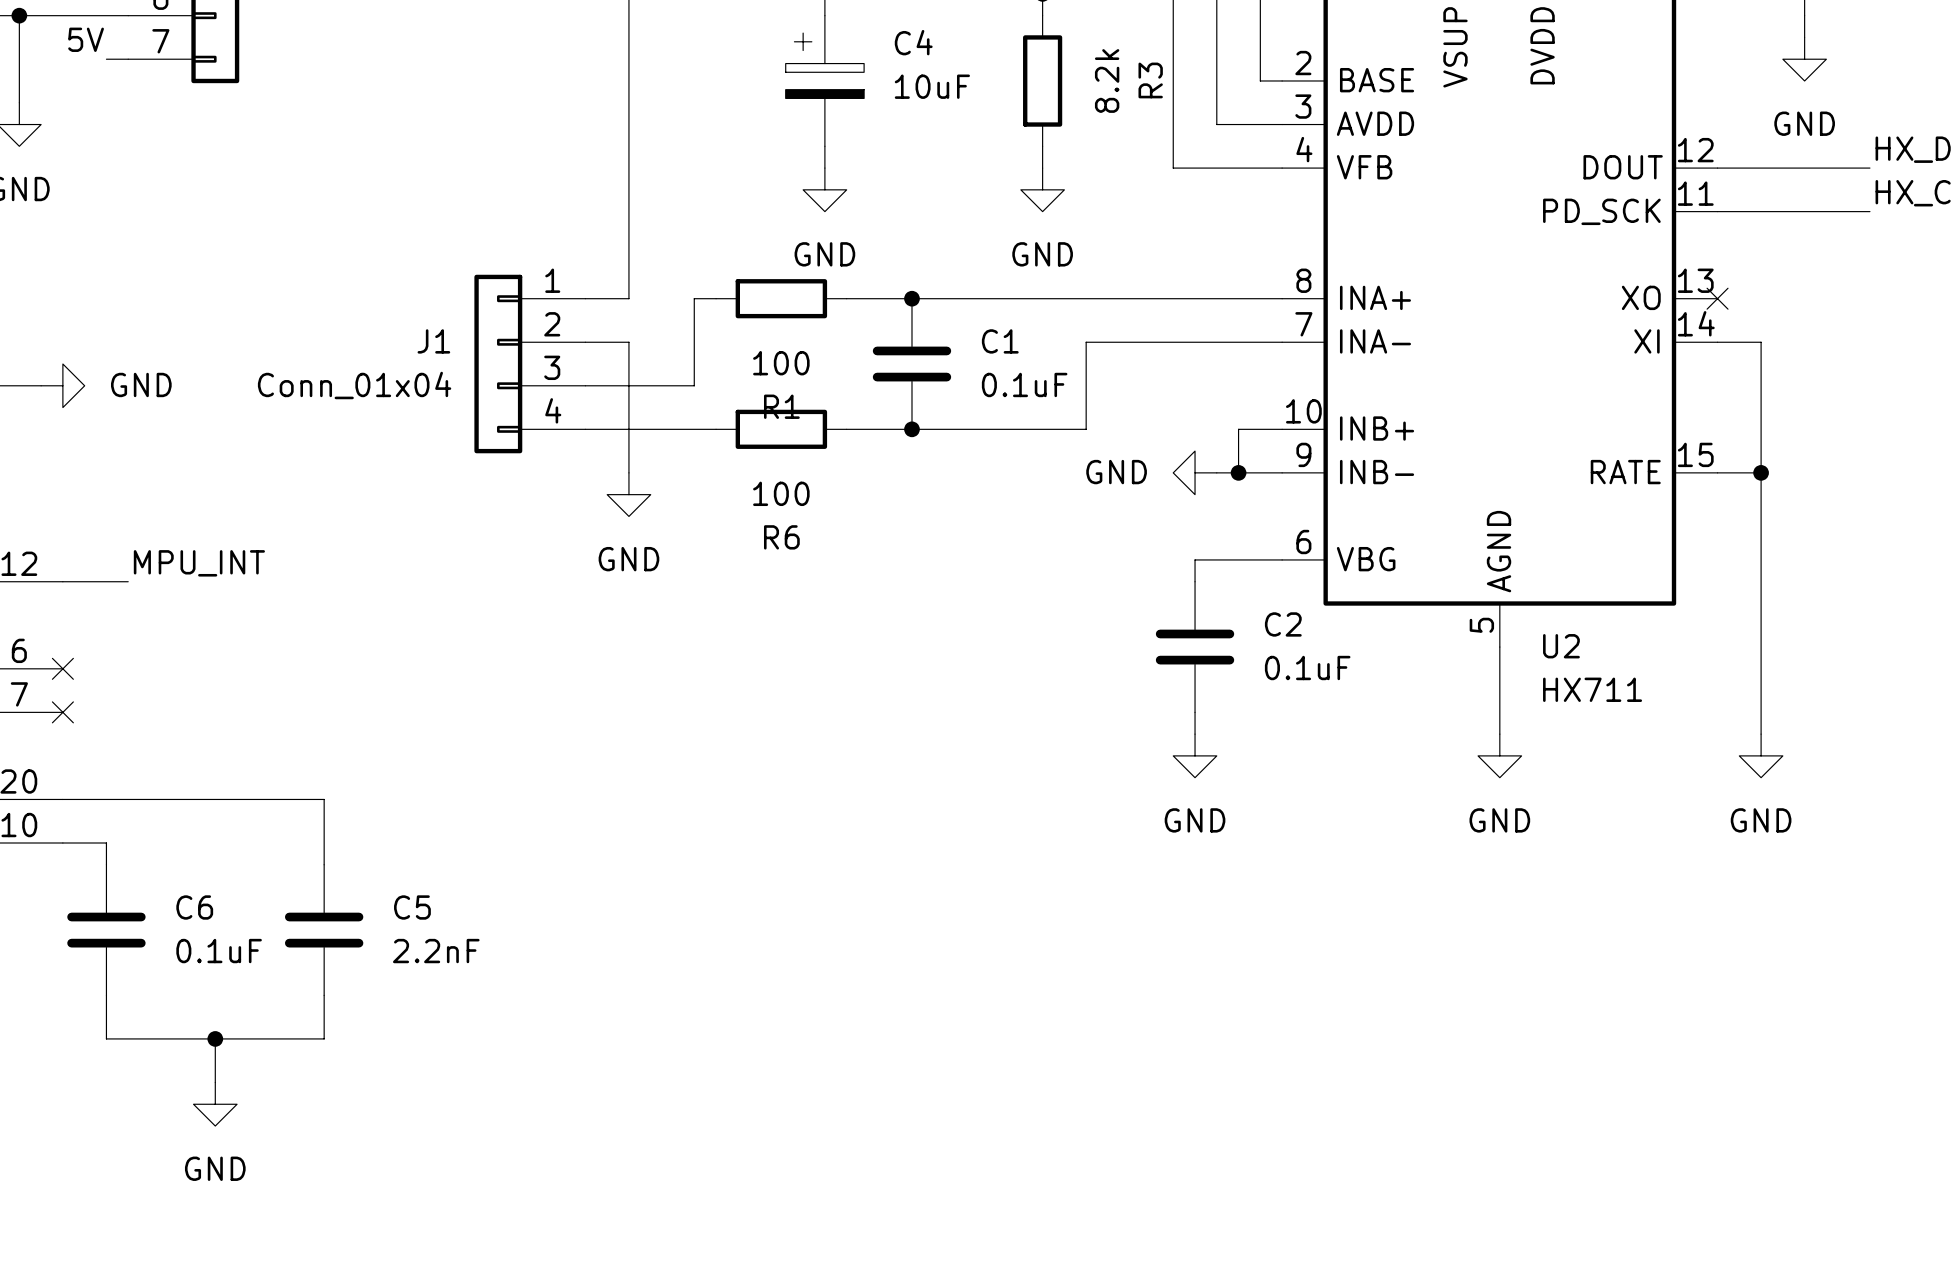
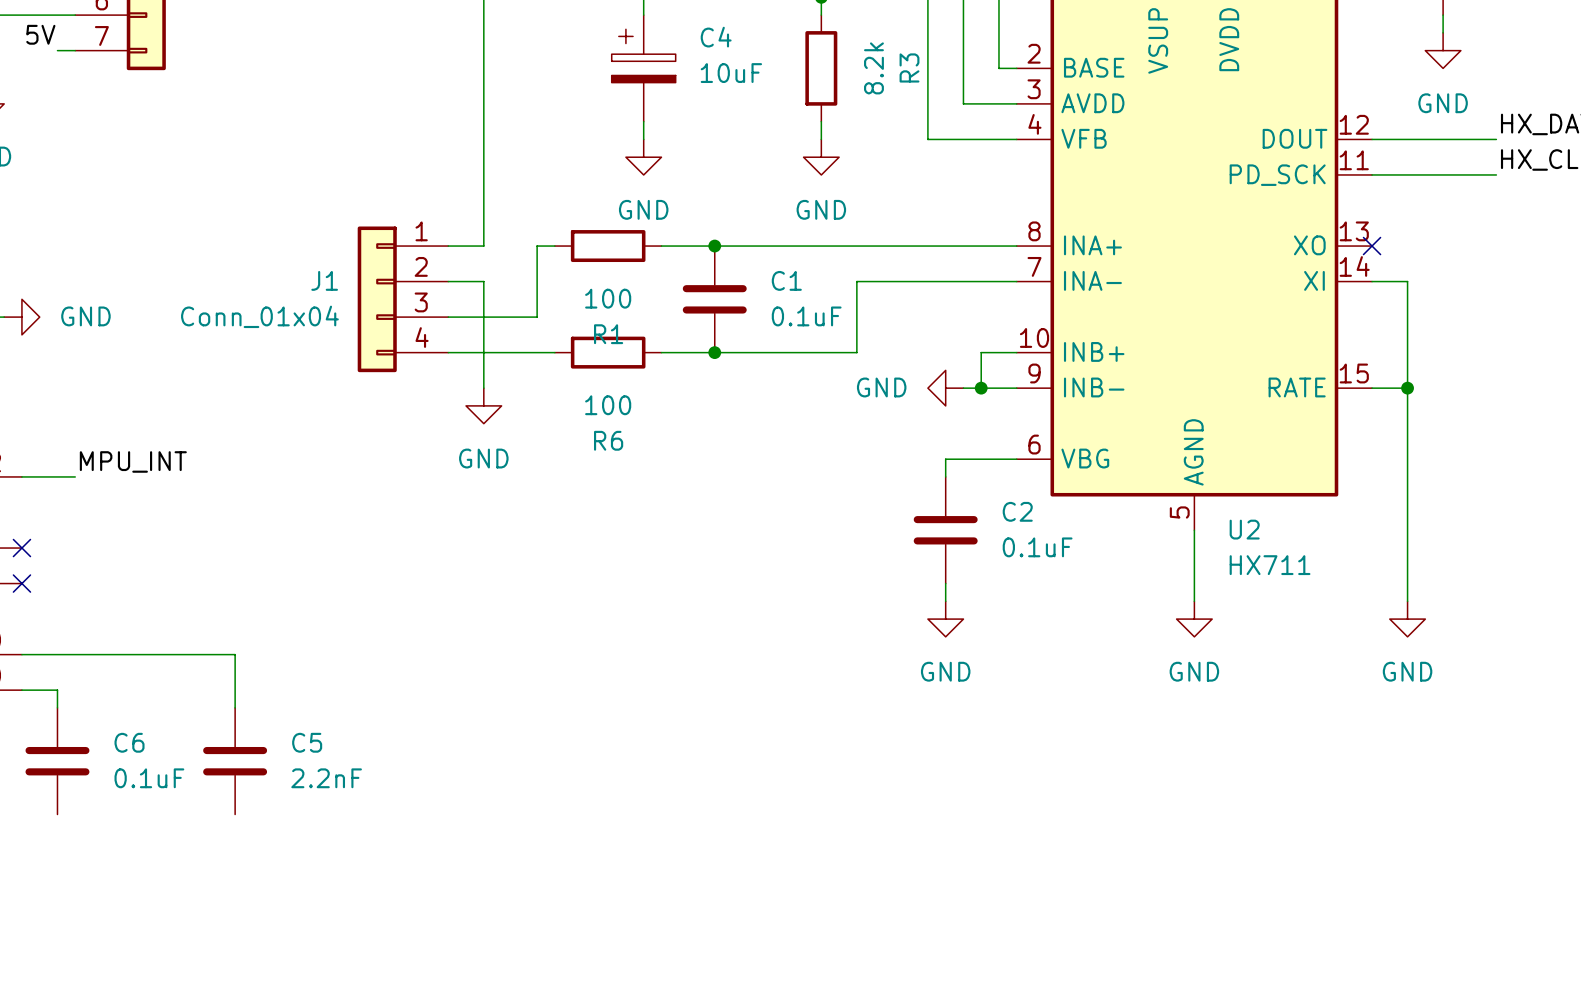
wire: (106, 995) (106, 1038) (324, 1038) (324, 995) -> none
wire: (215, 1038) (215, 1082) -> none
junction: (215, 1038) -> none
power symbol: GND (215, 1104) -> none

